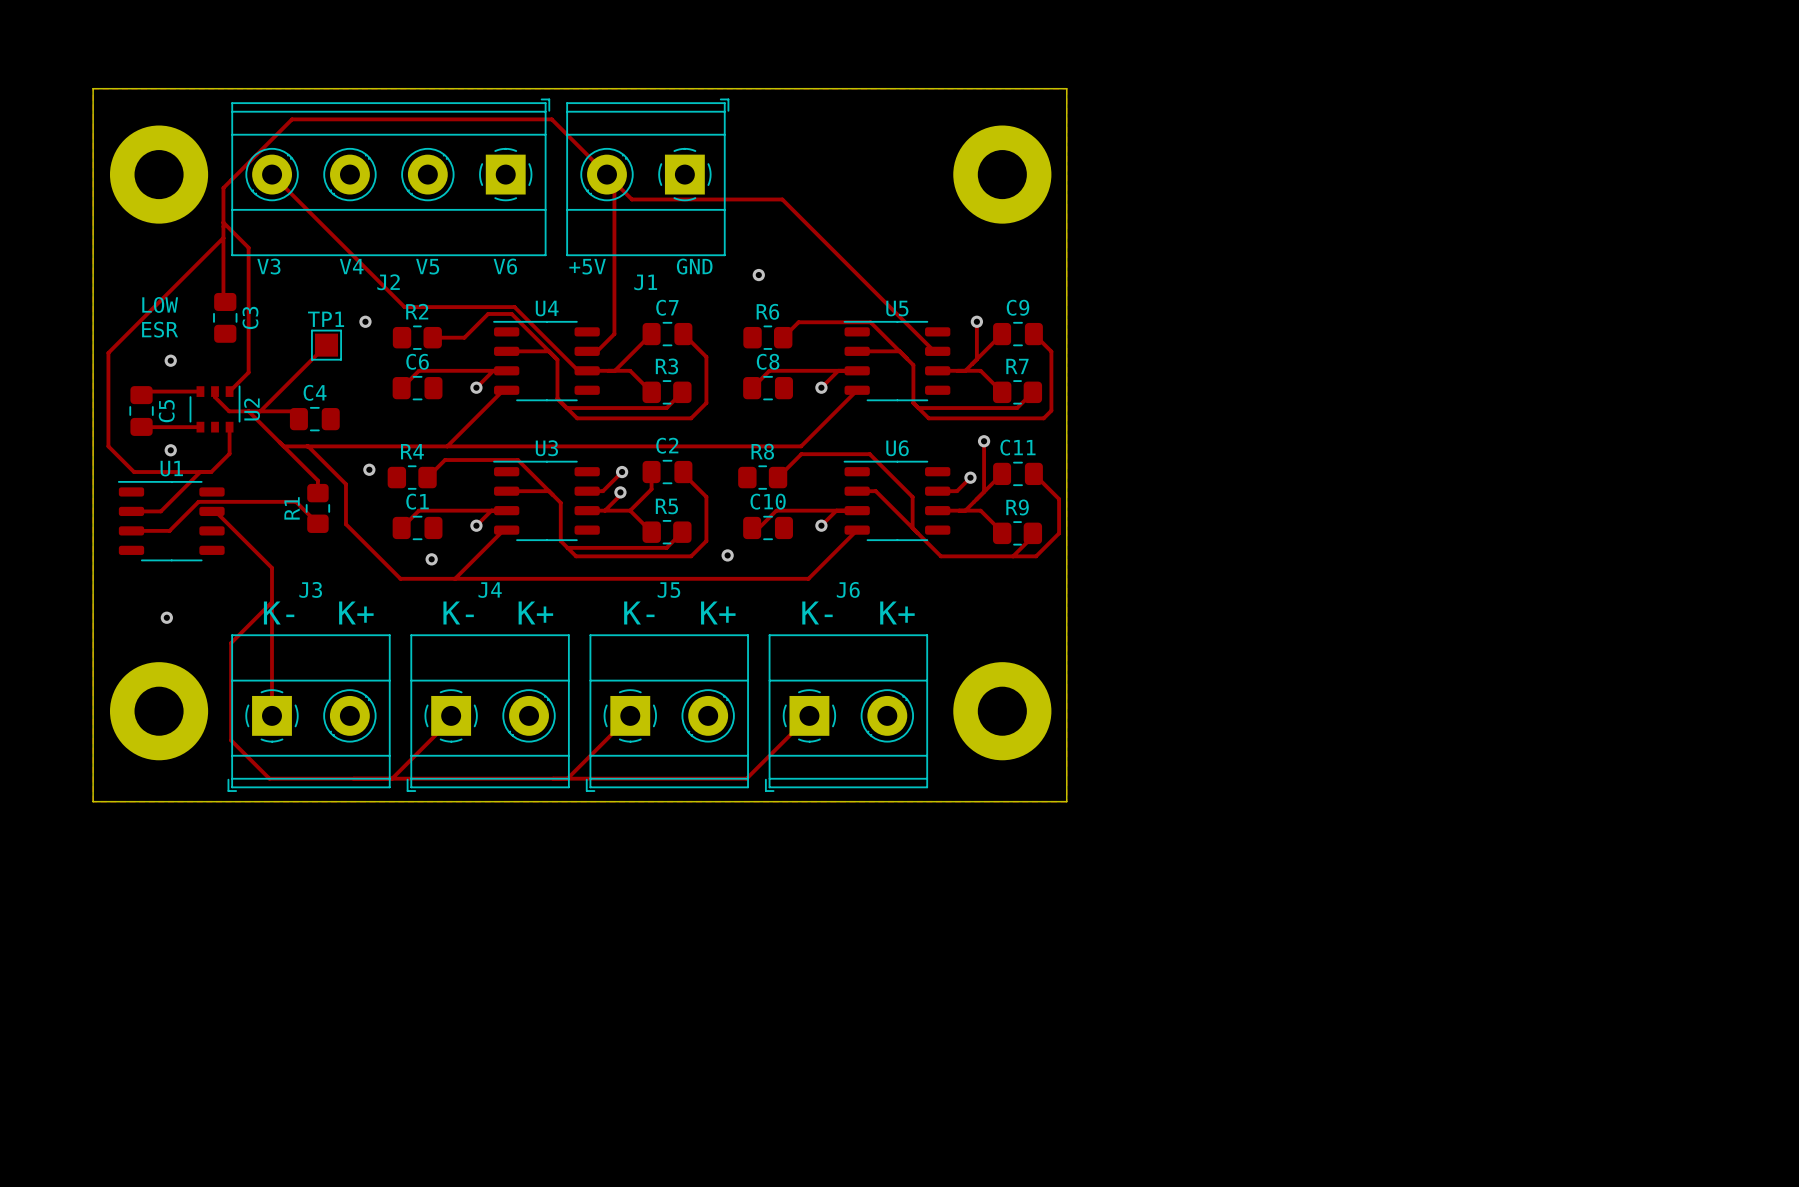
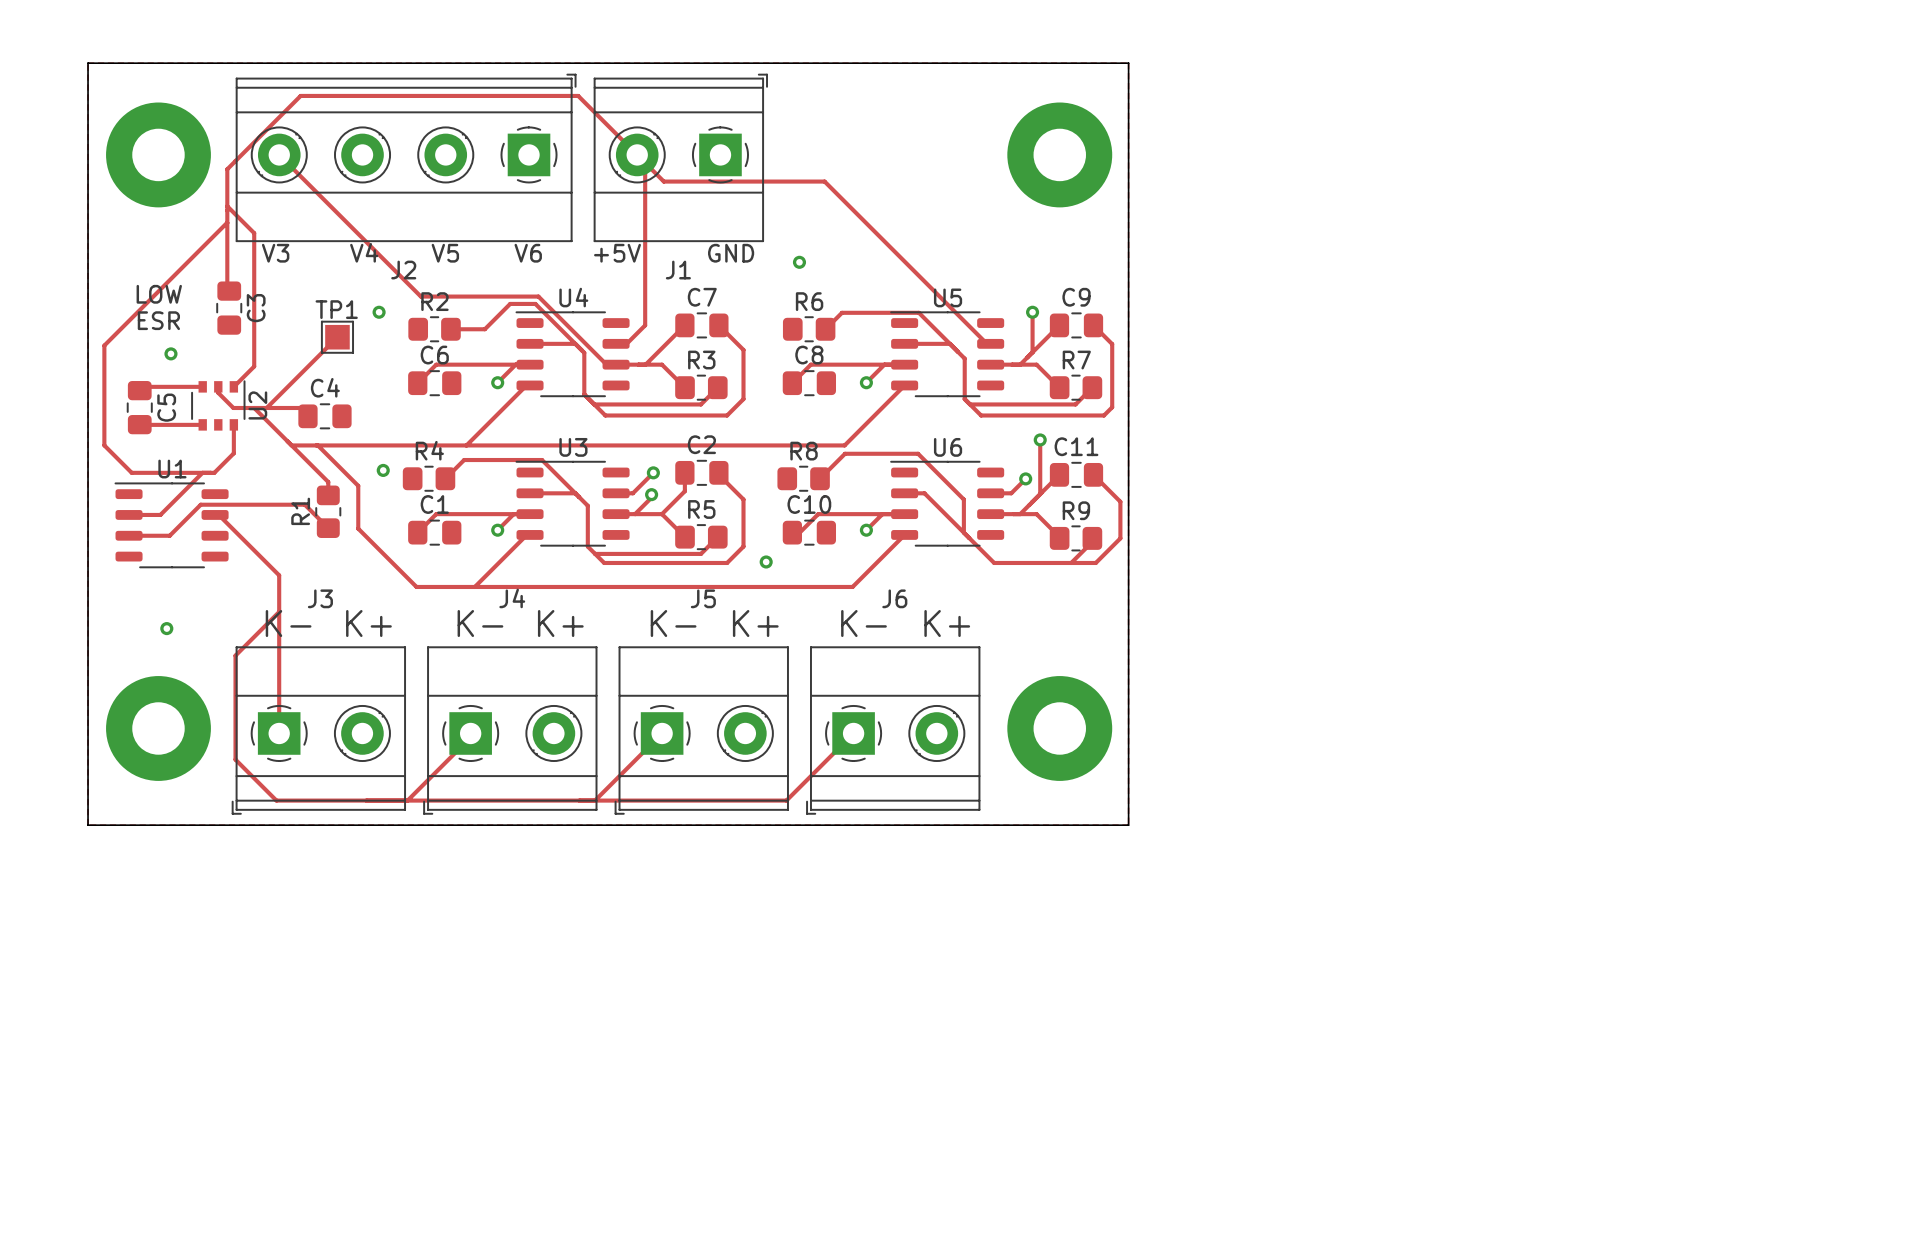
via: (170, 450) -> none
via: (431, 559) -> none

